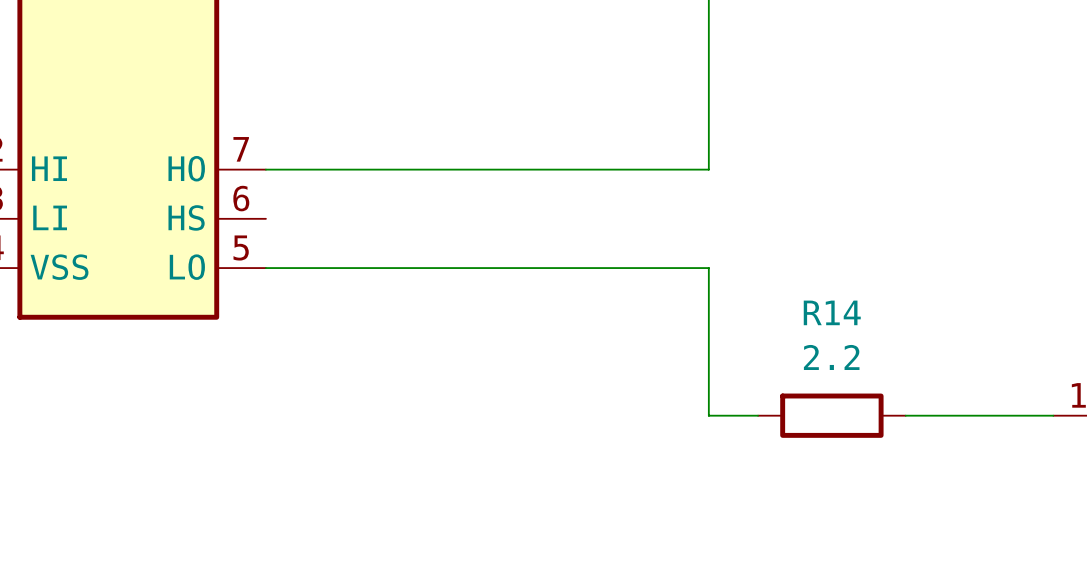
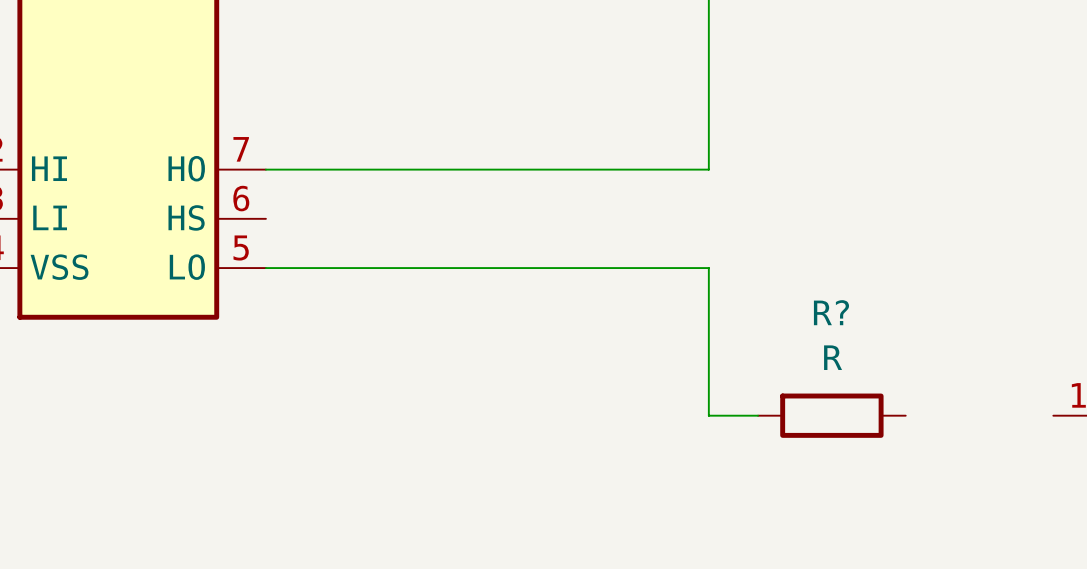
R14 name: R14 (832, 312) -> R? (831, 312)
R14 value: 2.2 (831, 357) -> R (833, 357)
wire: (905, 415) (1053, 415) -> none

